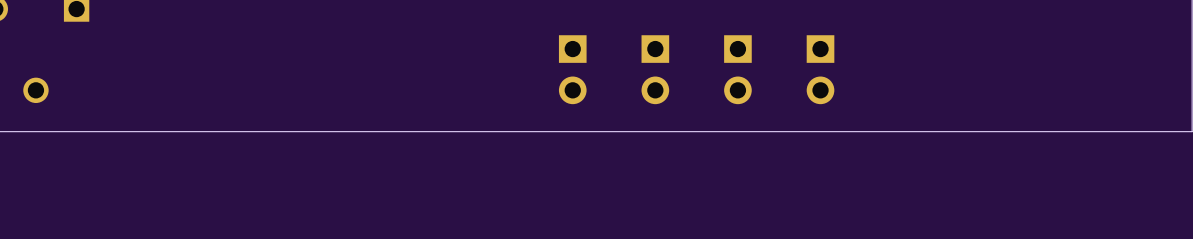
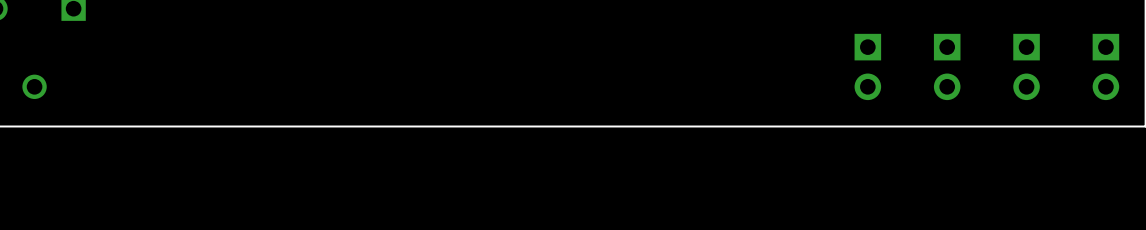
part: (572, 69) -> none
part: (655, 69) -> none
part: (737, 69) -> none
part: (820, 69) -> none
part: none -> (867, 66)
part: none -> (947, 66)
part: none -> (1026, 66)
part: none -> (1105, 66)

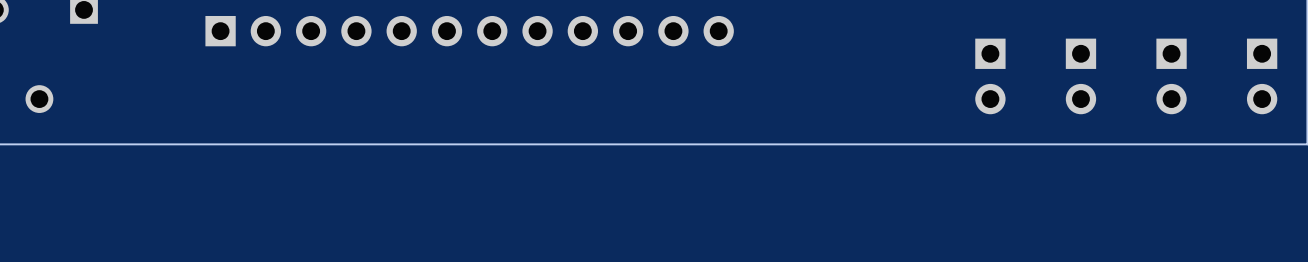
part: none -> (469, 31)

